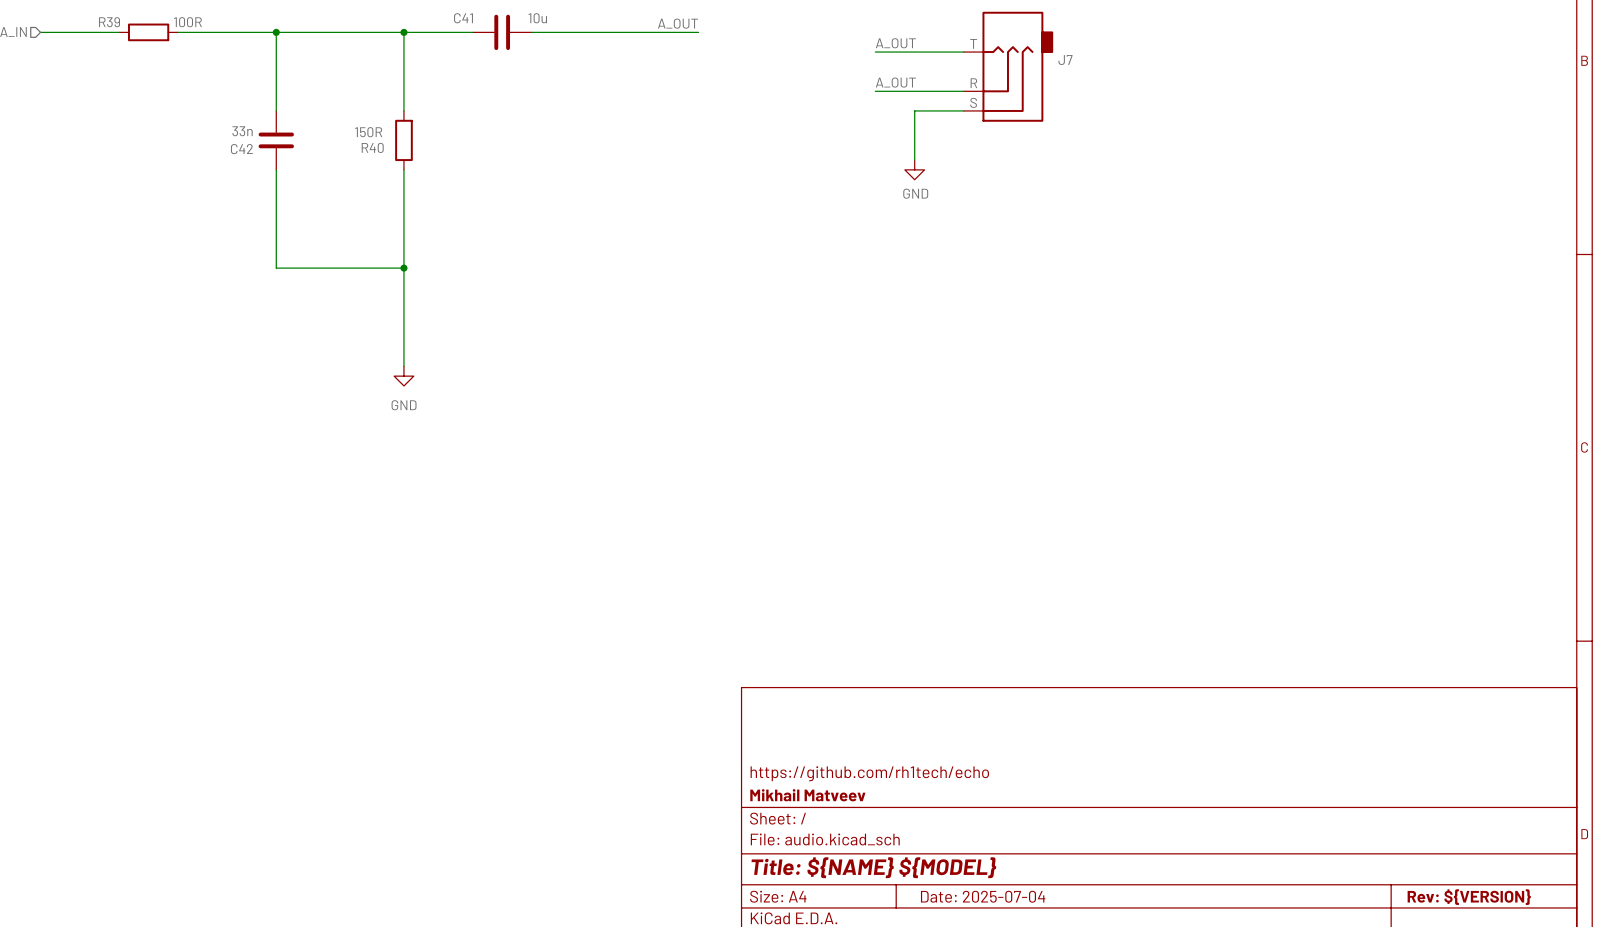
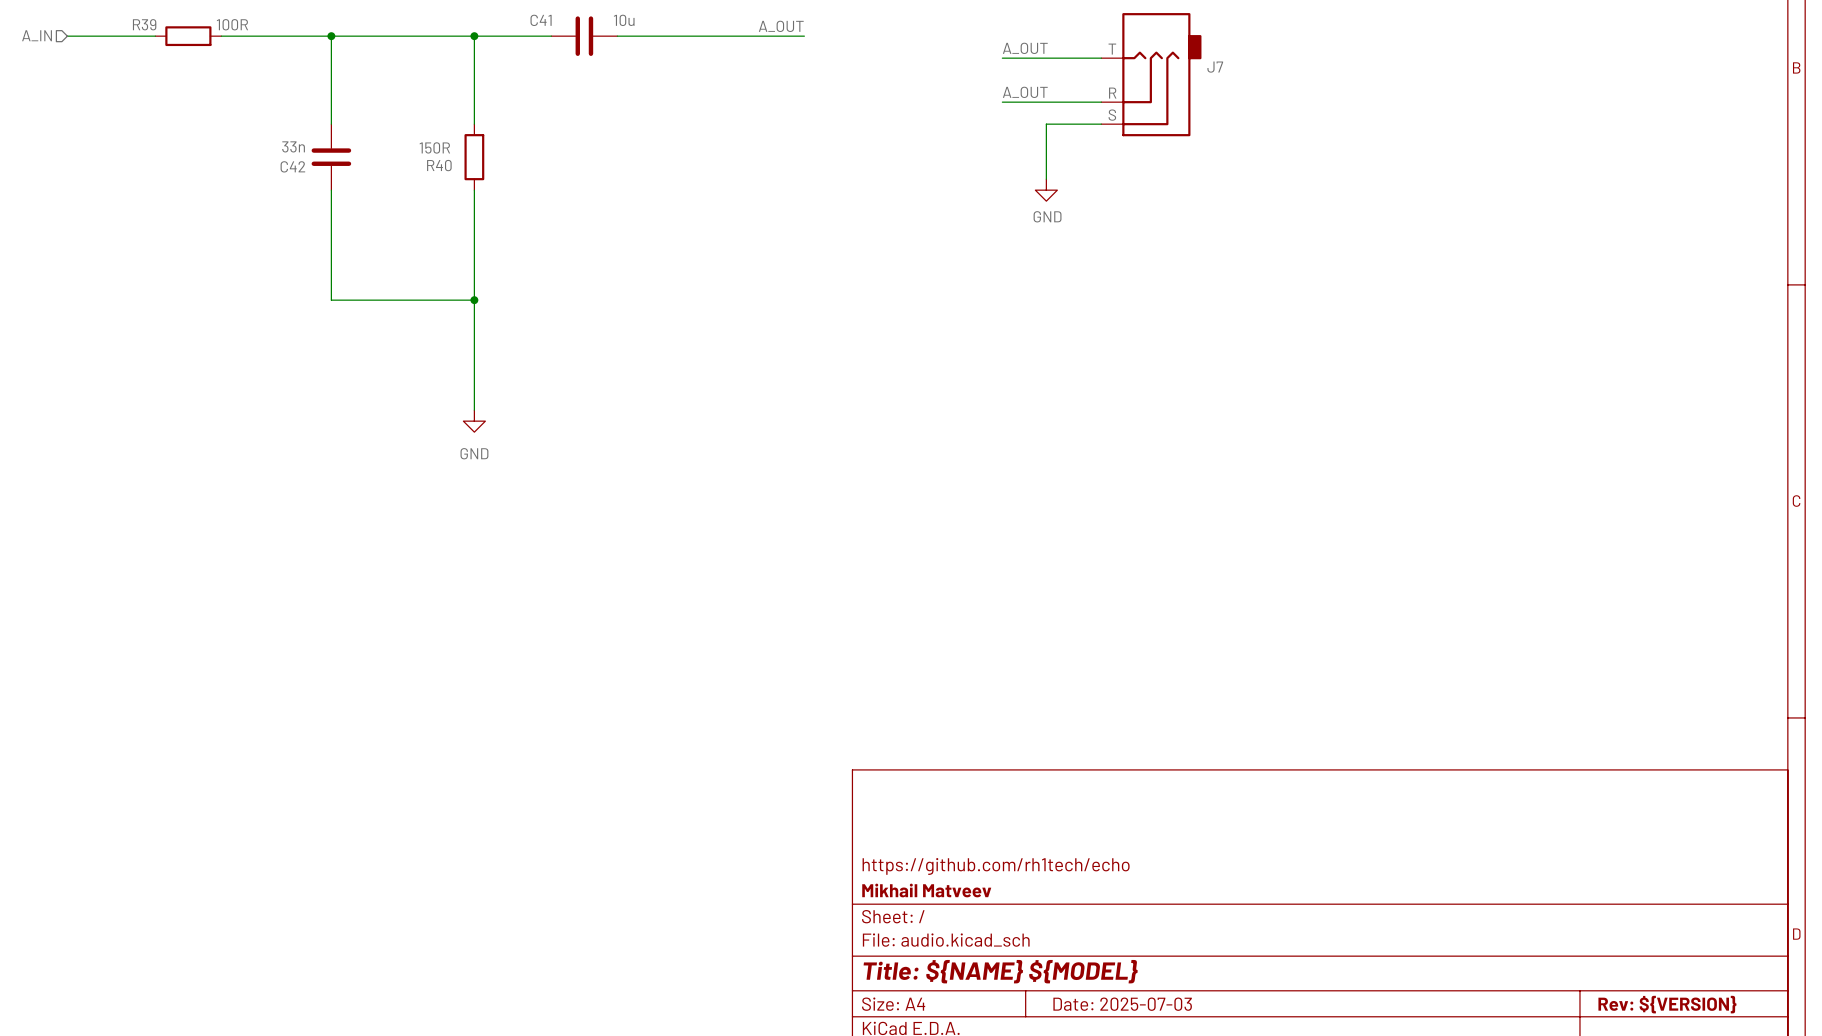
title block: Date: 2025-07-04 (983, 896) -> Date: 2025-07-03 (1122, 1004)

